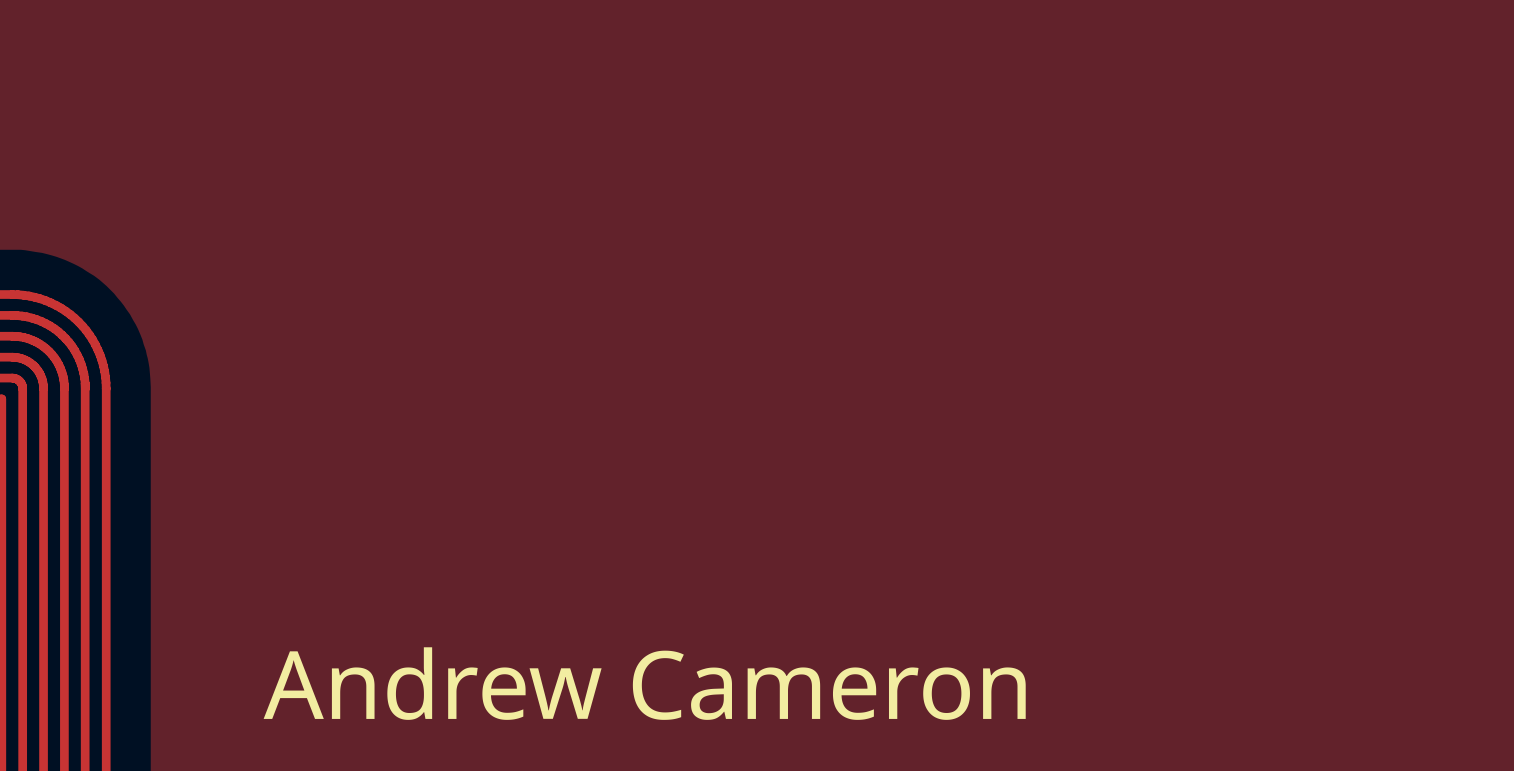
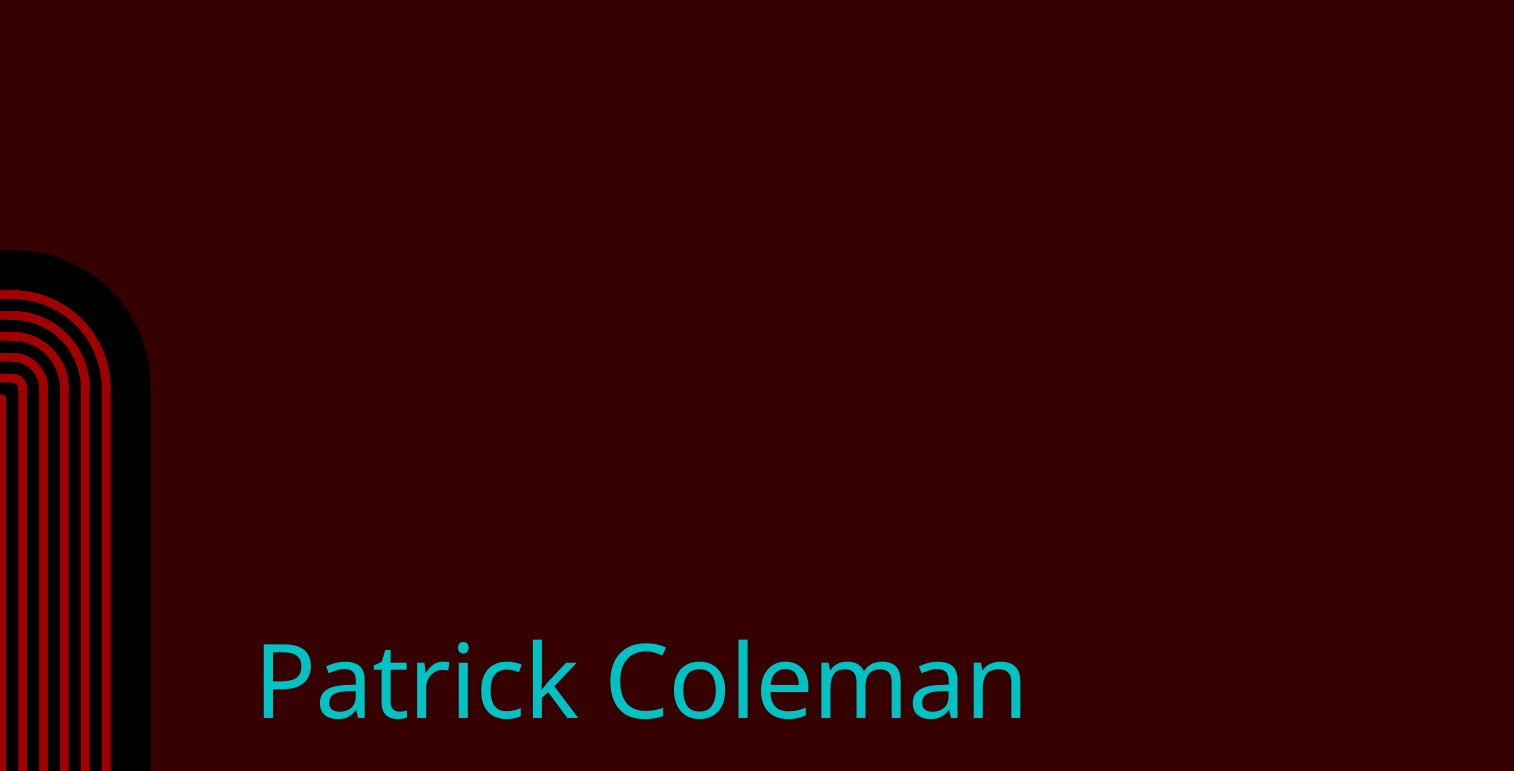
drawing: none -> [738, 639, 748, 718]
drawing: none -> [373, 641, 469, 720]
drawing: none -> [610, 643, 667, 720]
drawing: [387, 647, 433, 720] -> none
drawing: [632, 650, 684, 720] -> none
drawing shape: [263, 651, 324, 719] -> [263, 644, 311, 718]
drawing shape: [331, 667, 375, 719] -> [319, 661, 365, 720]
drawing shape: [448, 667, 478, 719] -> [458, 662, 468, 718]
drawing shape: [482, 667, 526, 720] -> [481, 661, 522, 720]
drawing shape: [691, 667, 732, 720] -> [673, 661, 726, 720]
drawing shape: [747, 667, 821, 719] -> [761, 661, 809, 720]
drawing shape: [832, 667, 877, 720] -> [821, 661, 901, 718]
drawing: [888, 667, 919, 719] -> none
drawing shape: [923, 667, 970, 720] -> [912, 661, 958, 720]
drawing shape: [983, 667, 1026, 719] -> [973, 661, 1021, 718]
drawing shape: [529, 668, 602, 719] -> [532, 639, 579, 718]

